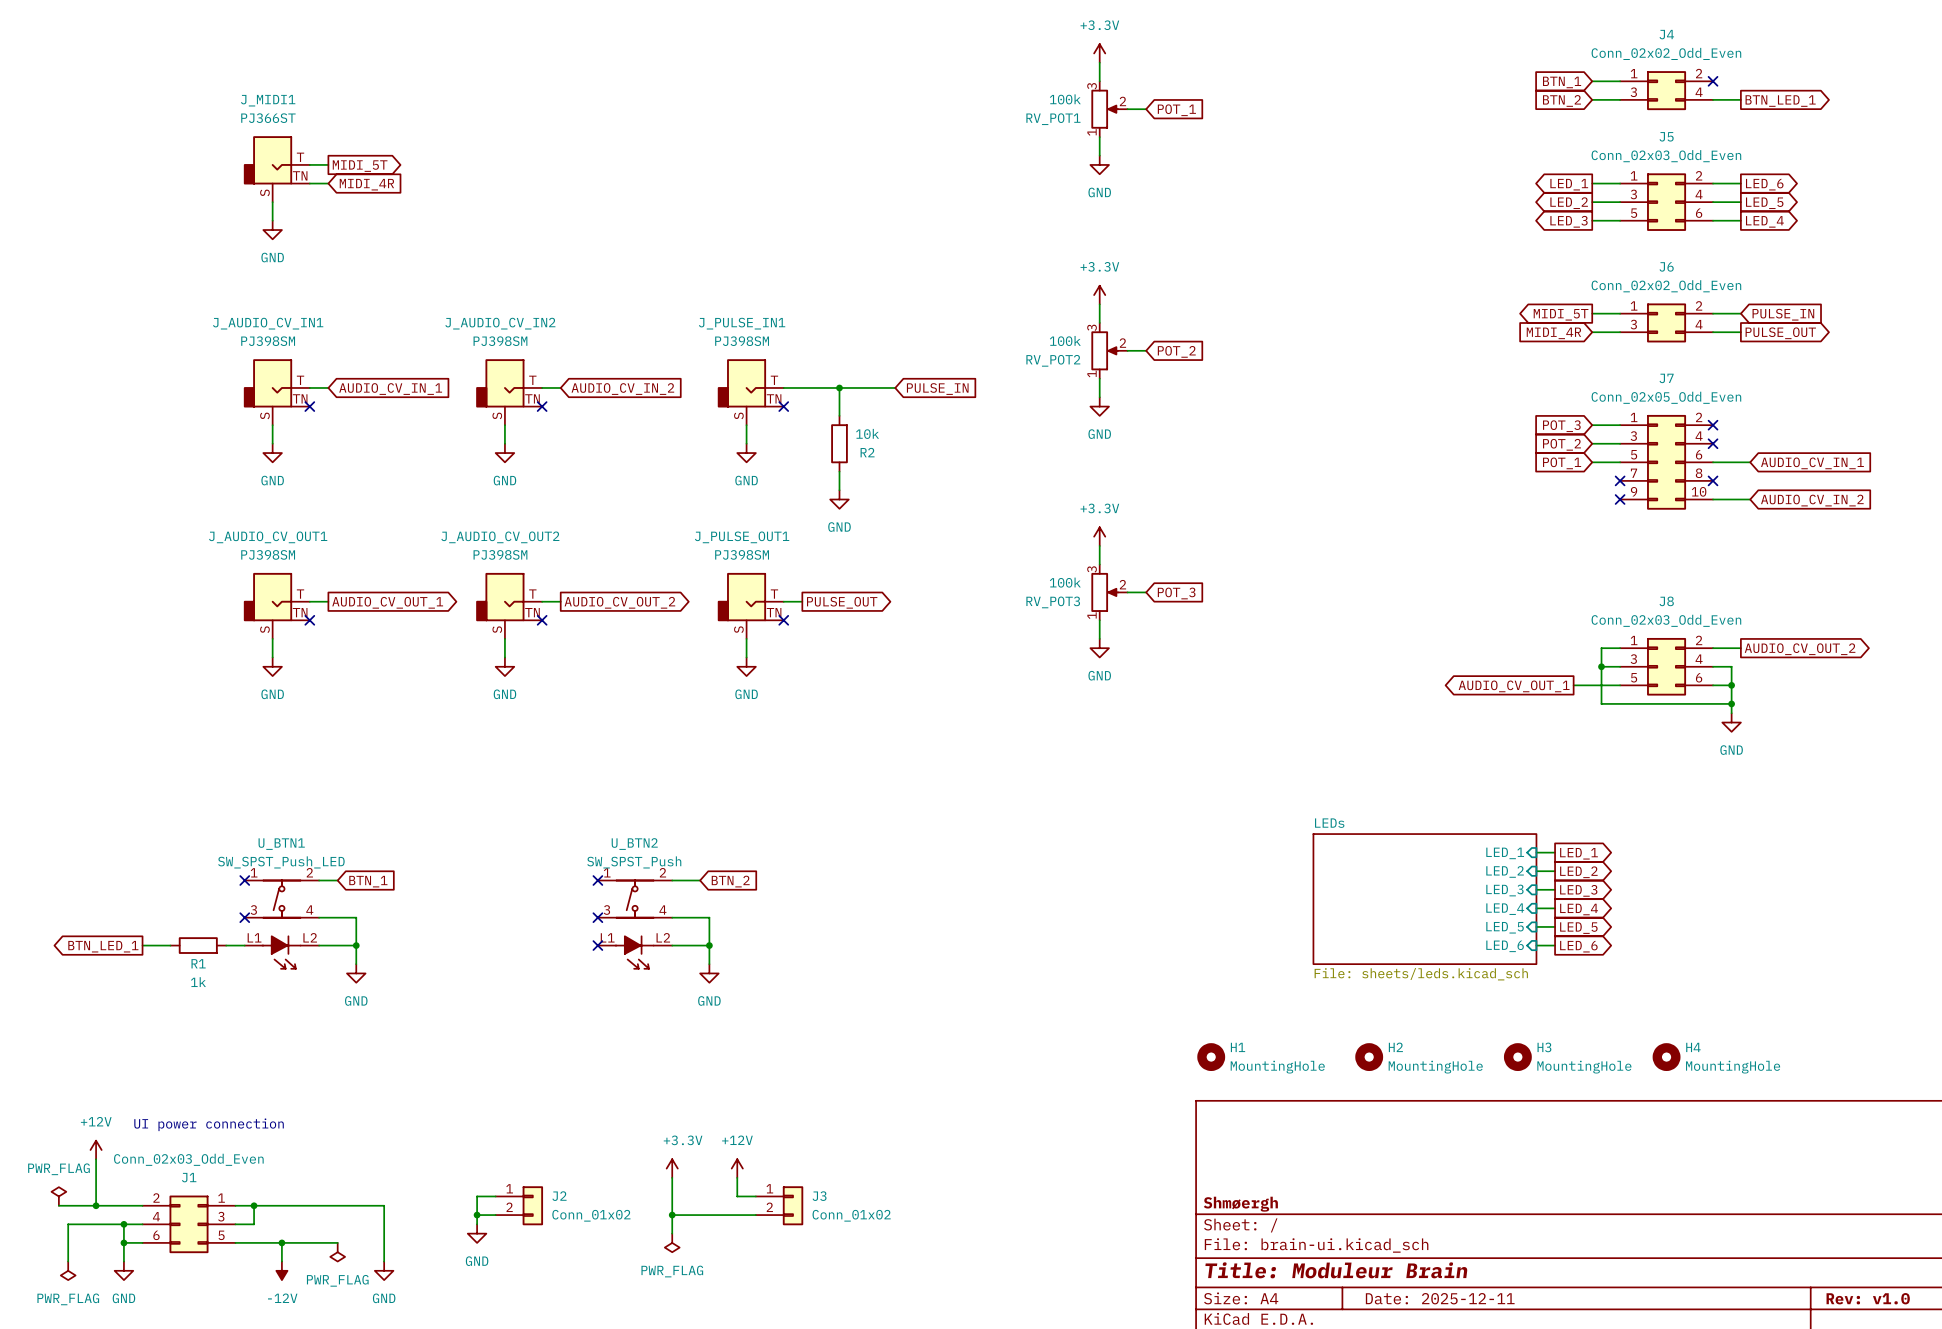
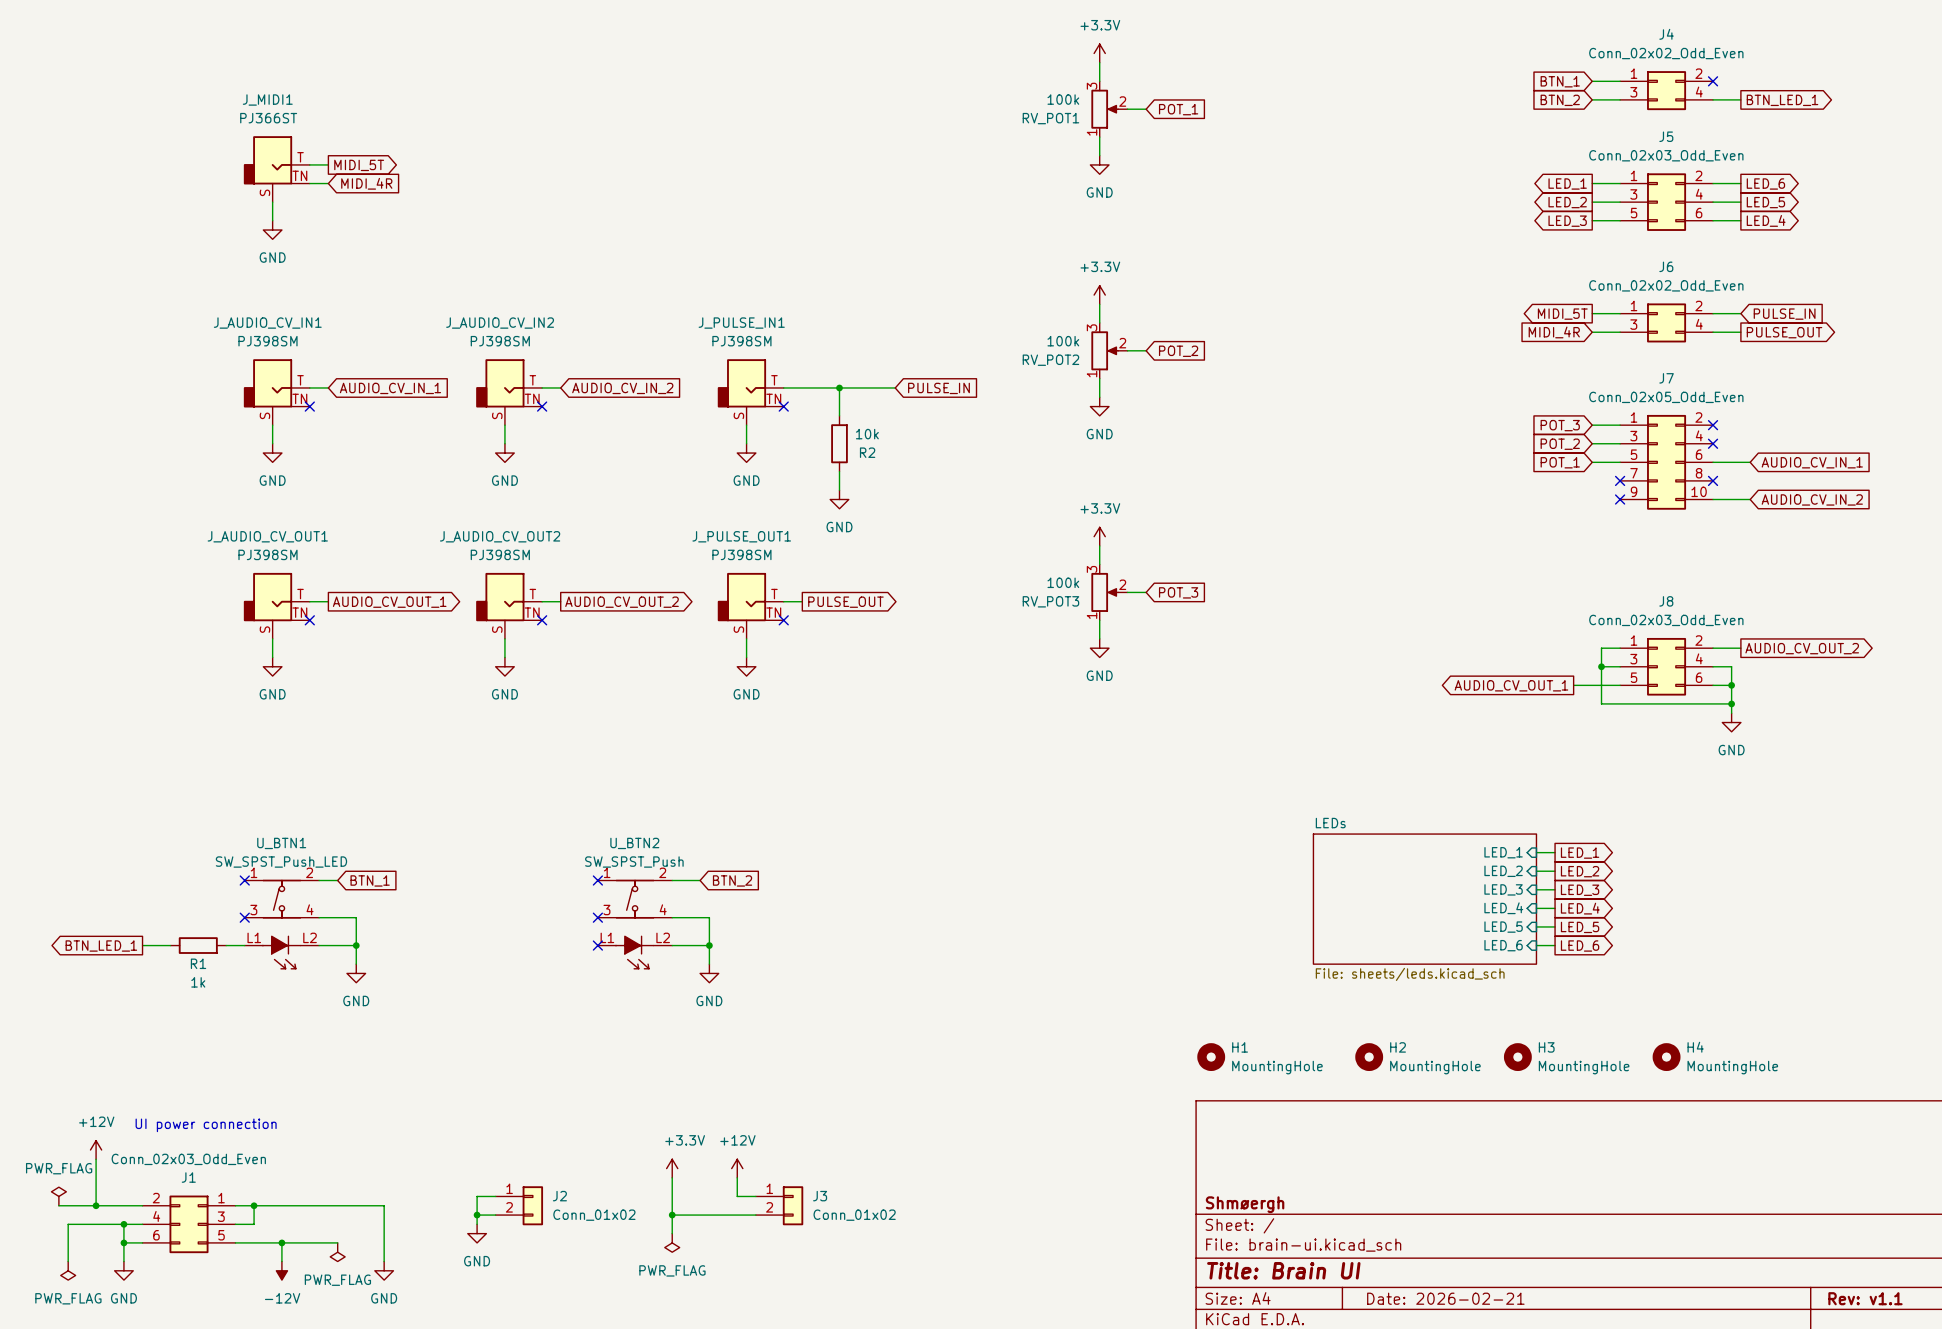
title block: Title: Moduleur Brain (1336, 1270) -> Title: Brain UI (1283, 1270)
title block: Date: 2025-12-11 (1440, 1298) -> Date: 2026-02-21 (1445, 1298)
title block: Rev: v1.0 (1868, 1298) -> Rev: v1.1 (1865, 1298)

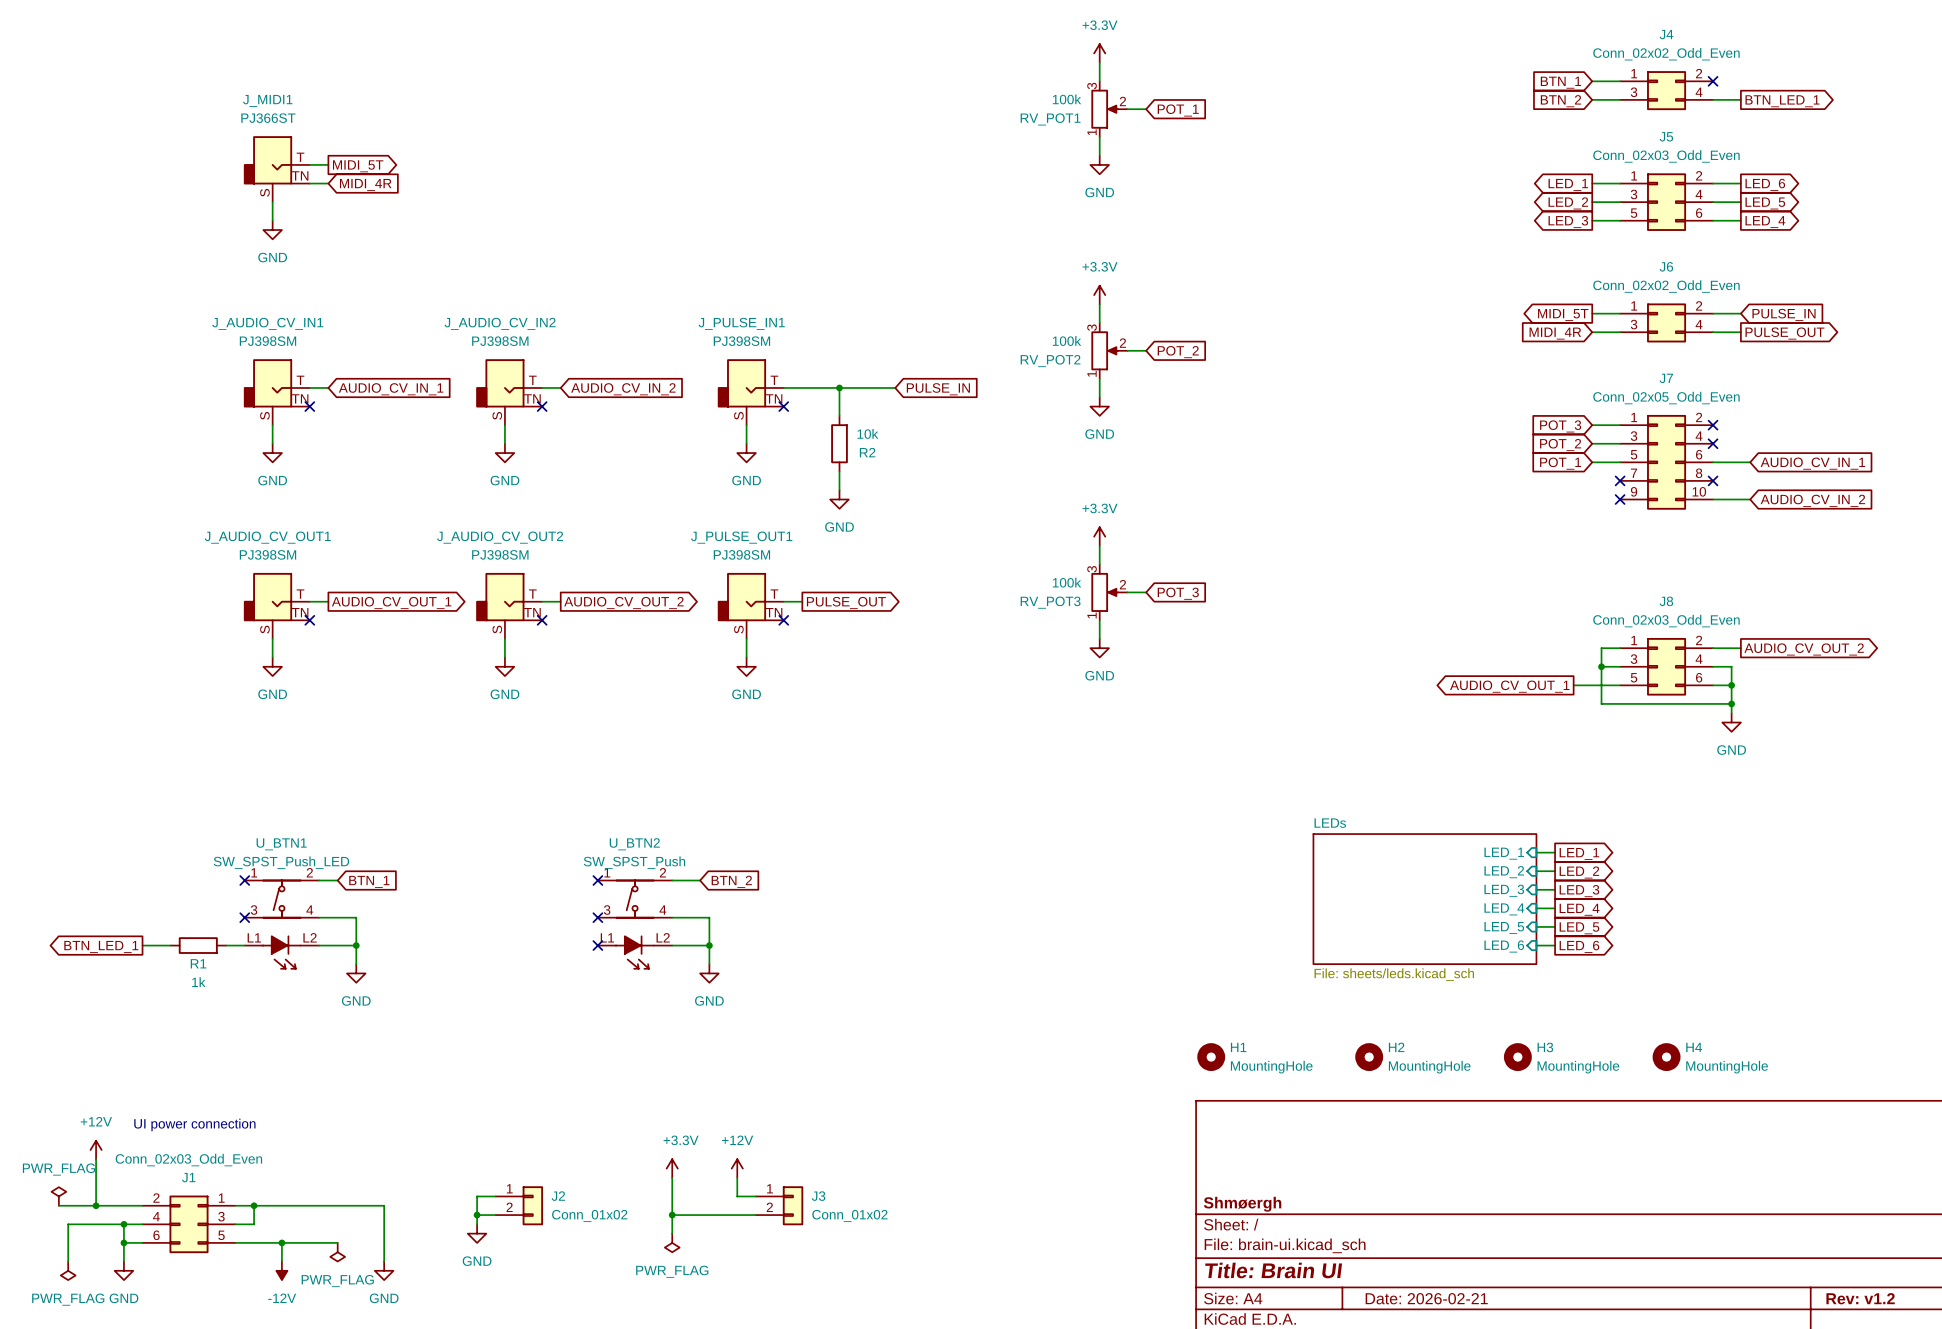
title block: Rev: v1.1 (1865, 1298) -> Rev: v1.2 (1860, 1298)

